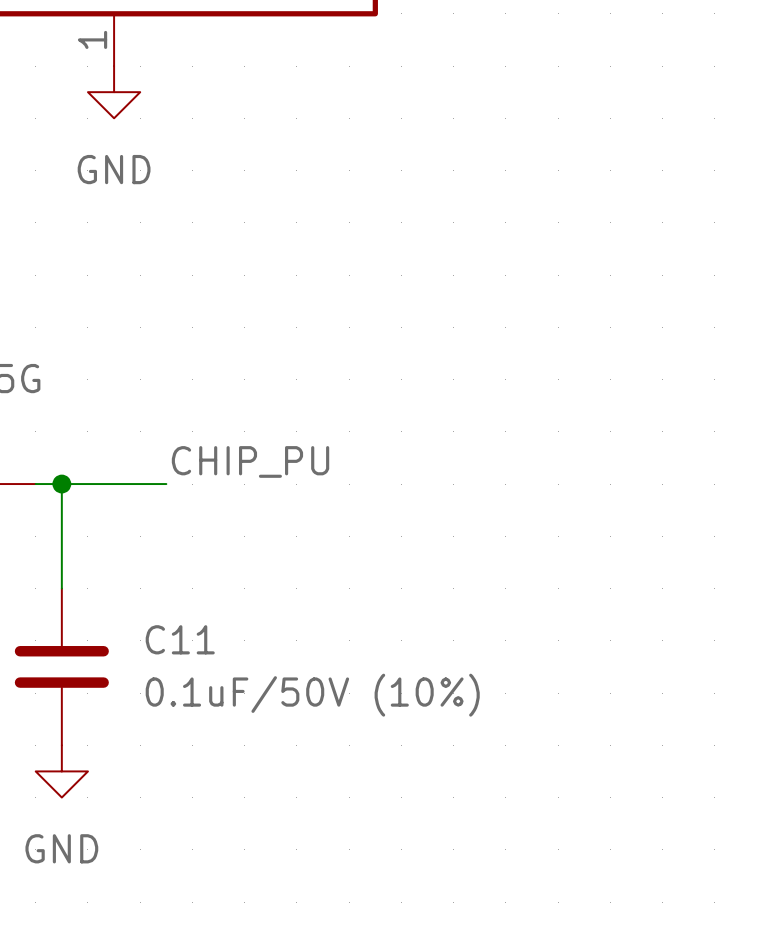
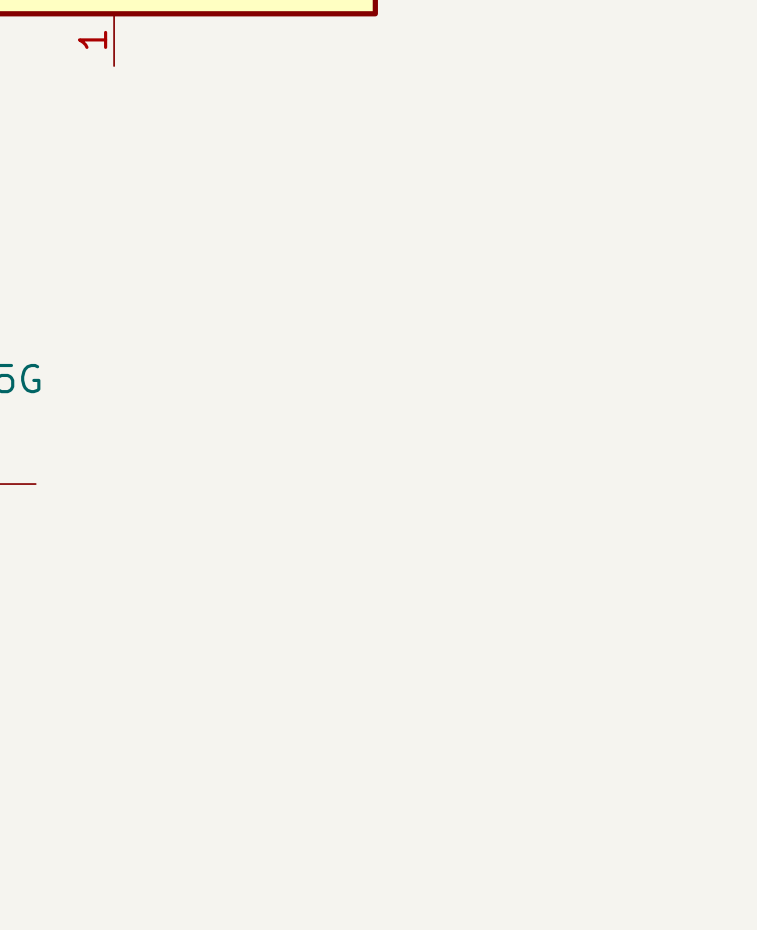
power symbol: GND (114, 92) -> none
label: CHIP_PU (250, 461) -> none
wire: (35, 484) (166, 484) -> none
wire: (61, 484) (61, 588) -> none
junction: (61, 484) -> none
C11: 0.1uF/50V (10%) (61, 666) -> none
power symbol: GND (61, 771) -> none

